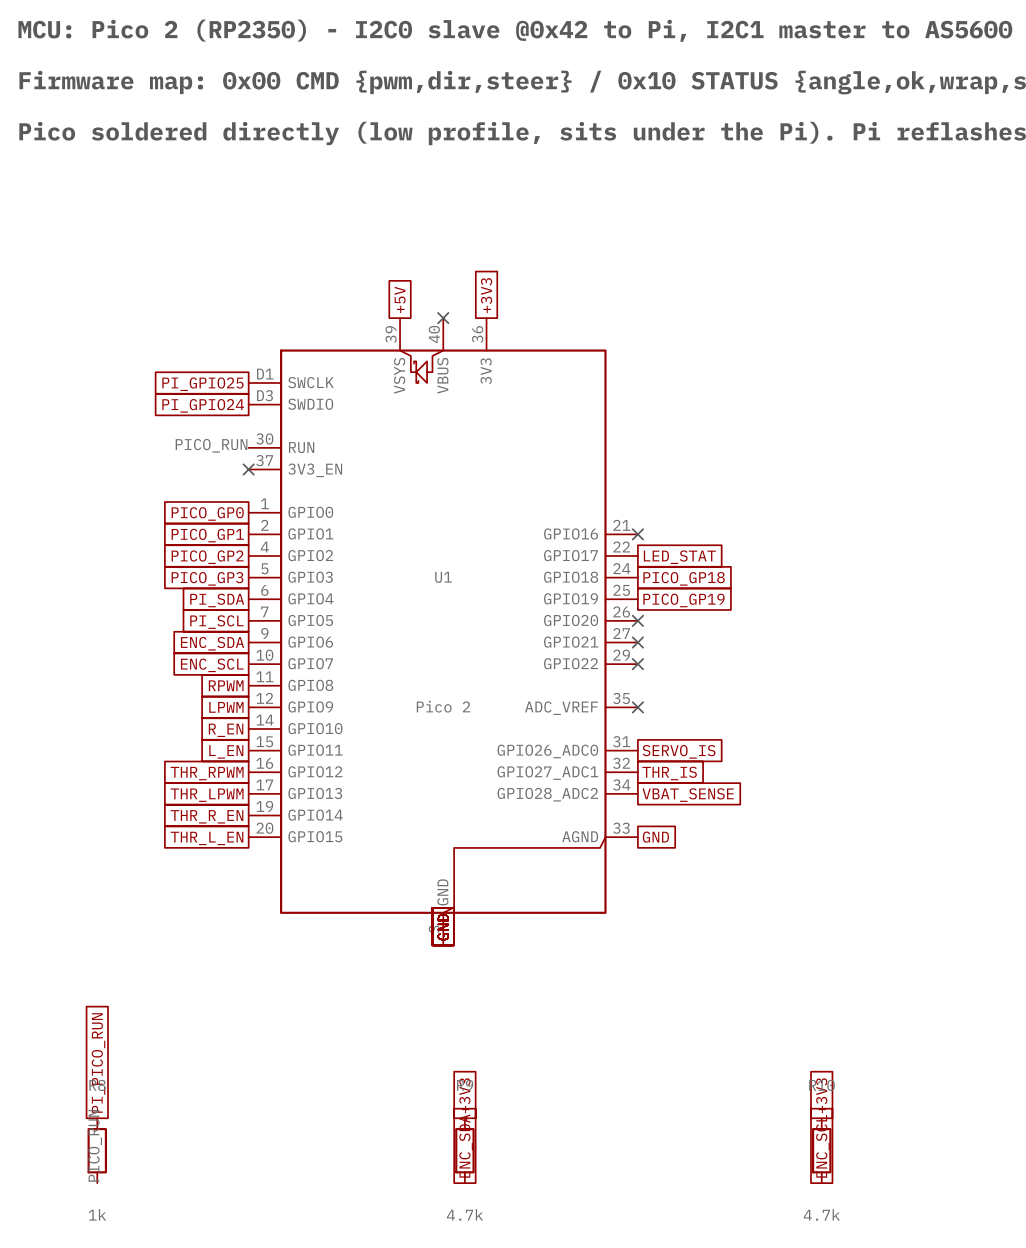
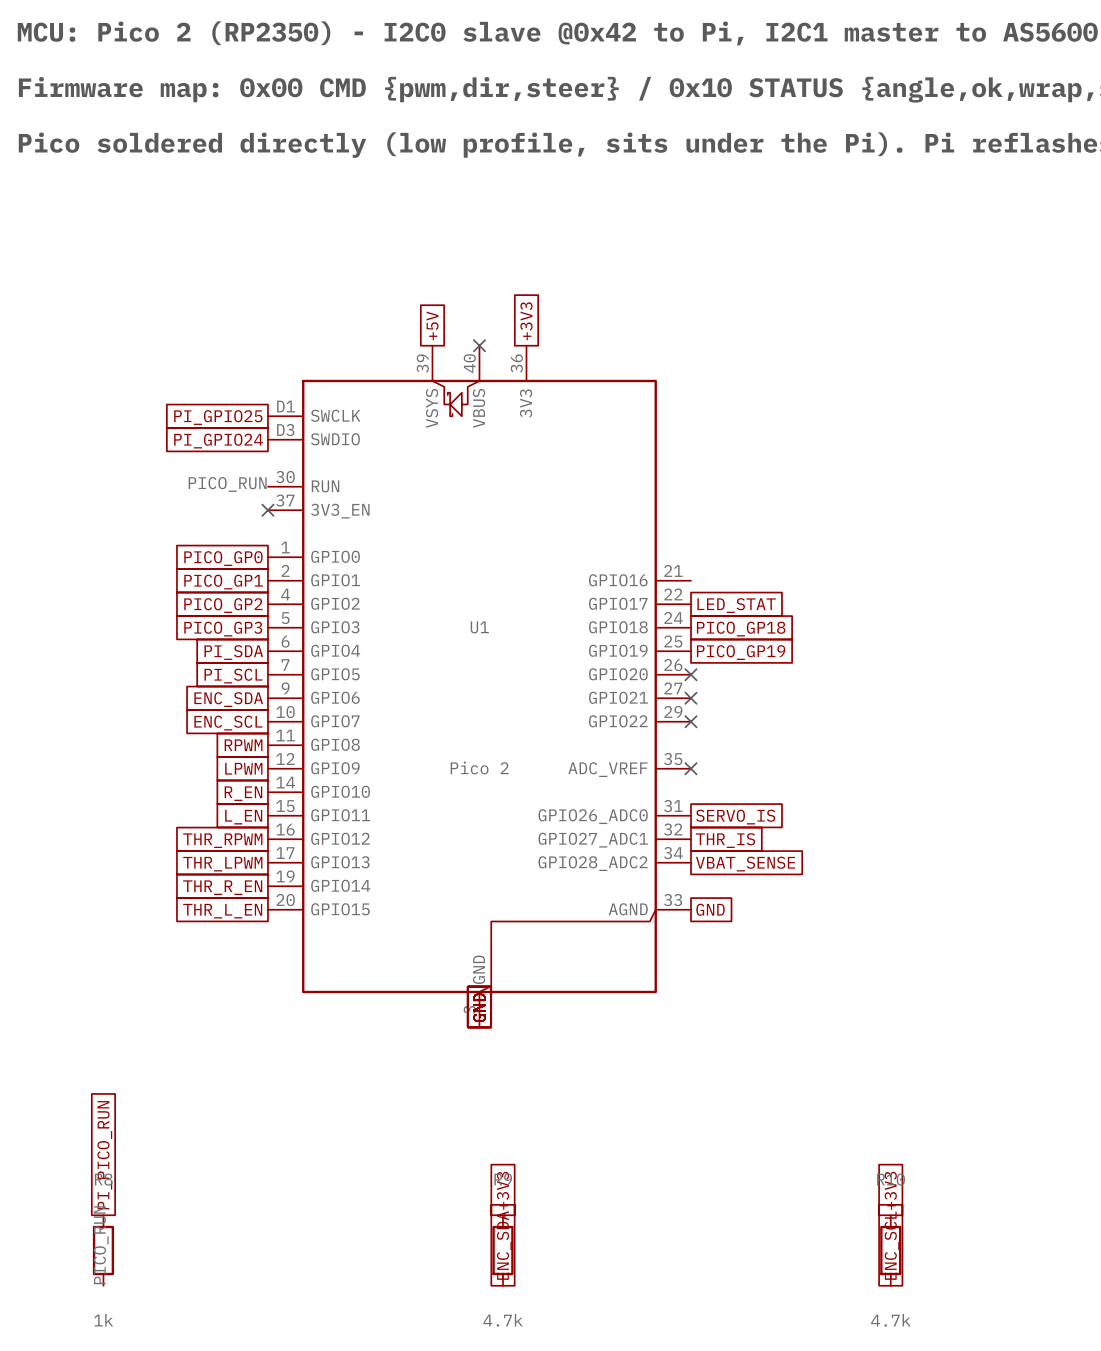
no-connect mark: (637, 534) -> none

